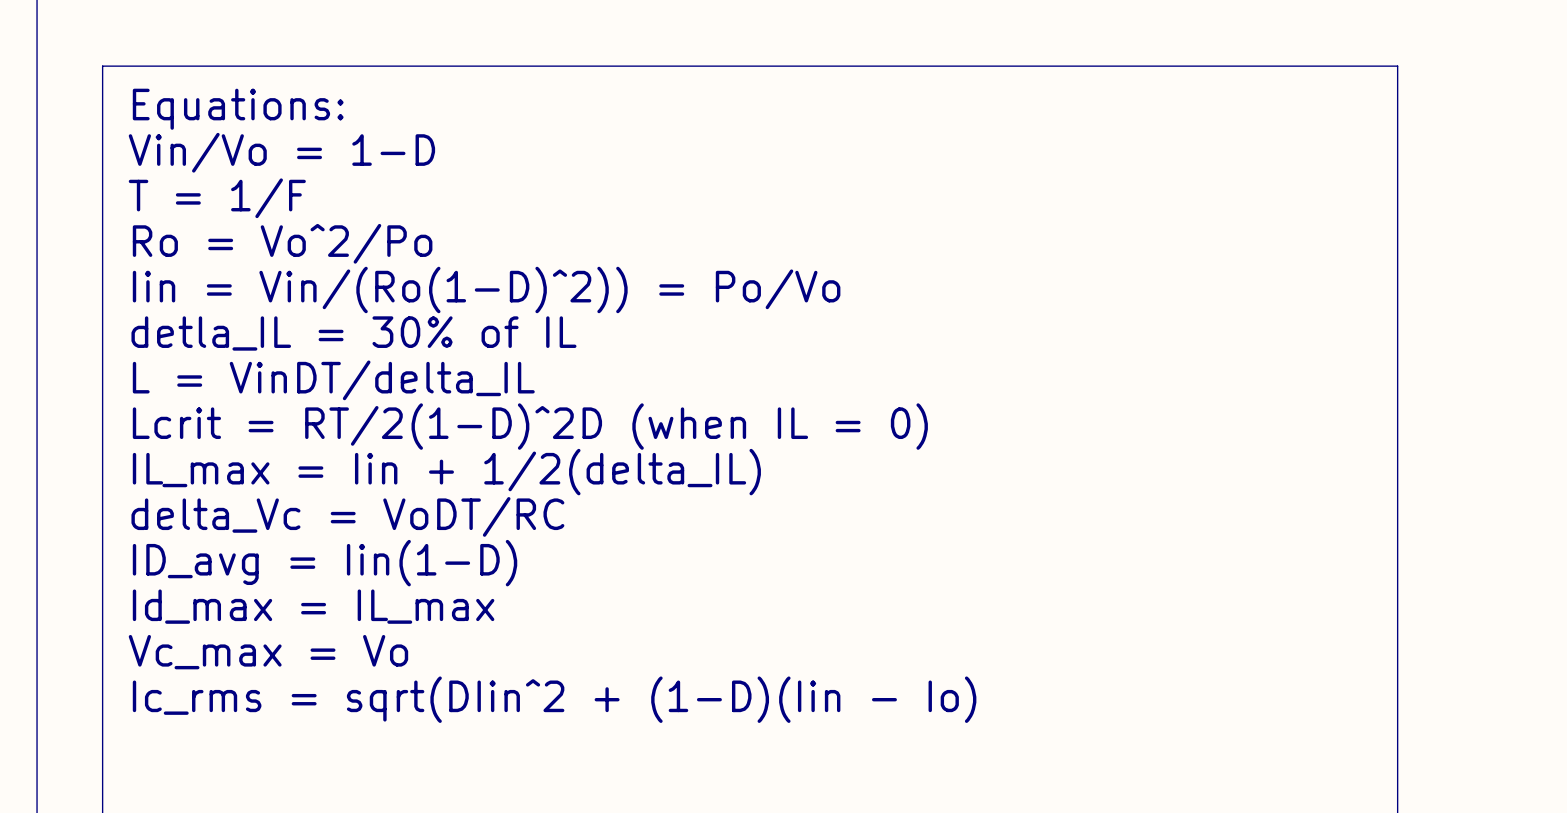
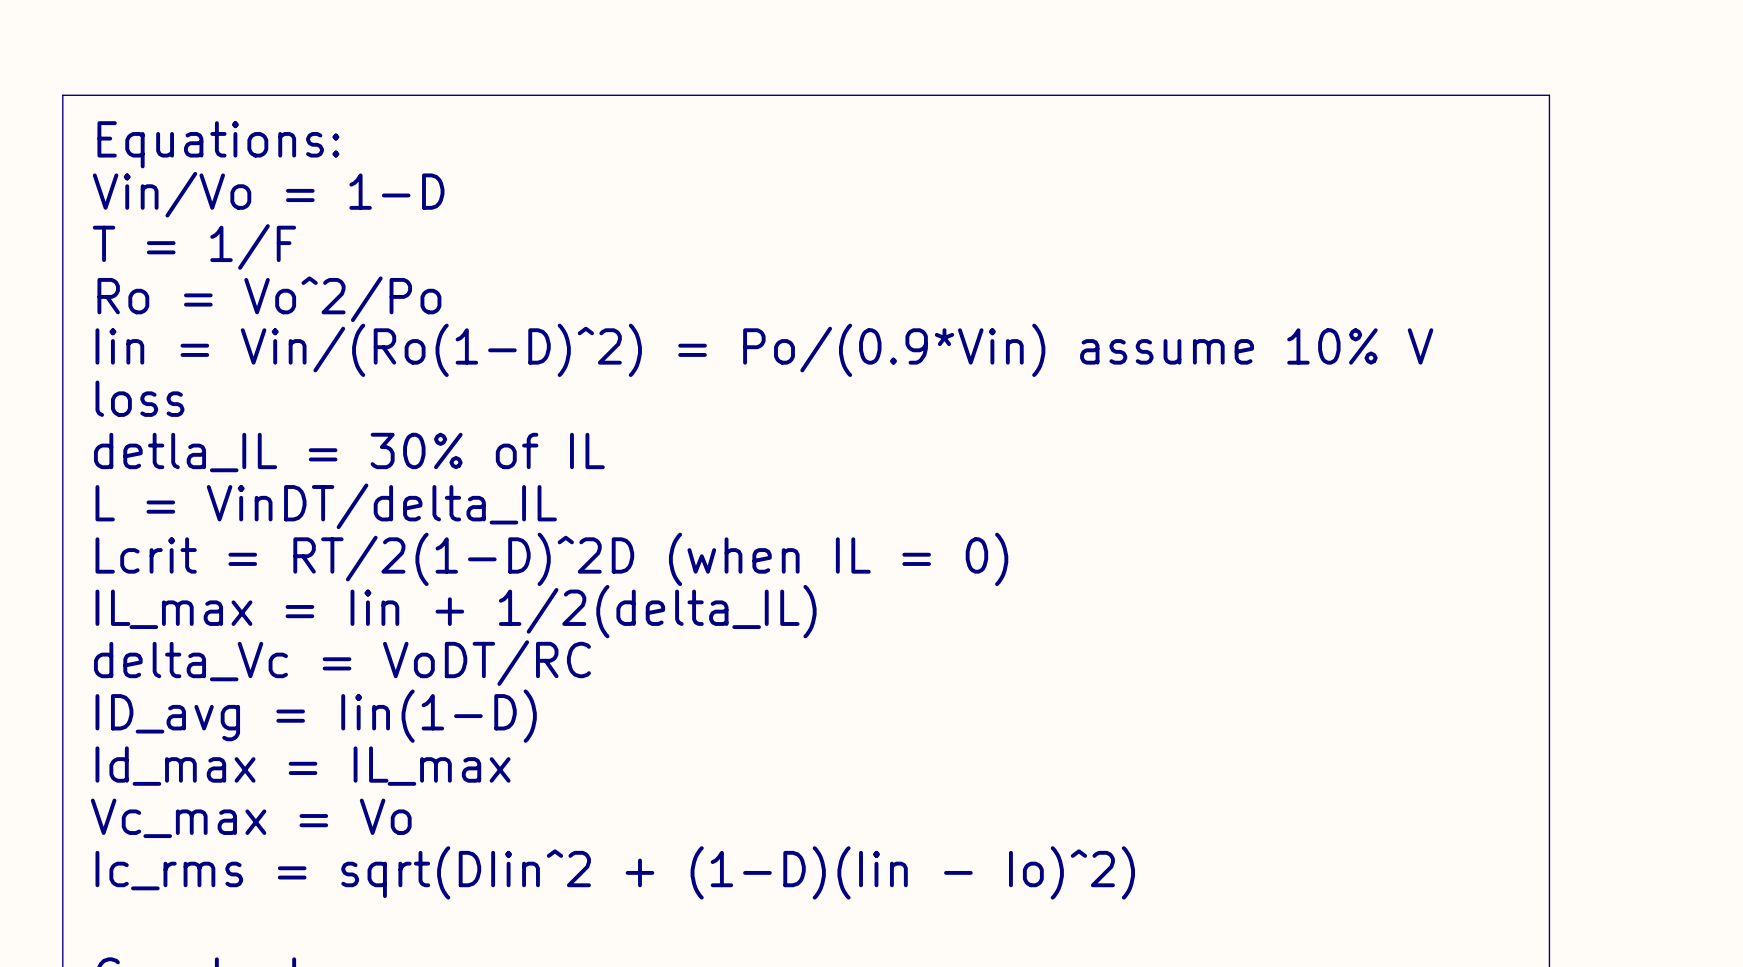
text: Iin = Vin/(Ro(1-D)^2)) = Po/Vo (486, 289) -> Iin = Vin/(Ro(1-D)^2) = Po/(0.9*Vin) assume 10% V (764, 350)
text: none -> loss (139, 398)
text position: detla_IL = 30% of IL (353, 333) -> detla_IL = 30% of IL (349, 452)
text position: L = VinDT/delta_IL (333, 380) -> L = VinDT/delta_IL (326, 506)
text position: Lcrit = RT/2(1-D)^2D (when IL = 0) (530, 426) -> Lcrit = RT/2(1-D)^2D (when IL = 0) (551, 559)
text position: IL_max = Iin + 1/2(delta_IL) (446, 472) -> IL_max = Iin + 1/2(delta_IL) (456, 611)
text position: delta_Vc = VoDT/RC (347, 516) -> delta_Vc = VoDT/RC (342, 663)
text position: ID_avg = Iin(1-D) (325, 563) -> ID_avg = Iin(1-D) (316, 716)
text position: Id_max = IL_max (313, 606) -> Id_max = IL_max (303, 766)
text position: Vc_max = Vo (268, 652) -> Vc_max = Vo (251, 818)
text: Ic_rms = sqrt(DIin^2 + (1-D)(Iin - Io) (554, 699) -> Ic_rms = sqrt(DIin^2 + (1-D)(Iin - Io)^2) (615, 872)

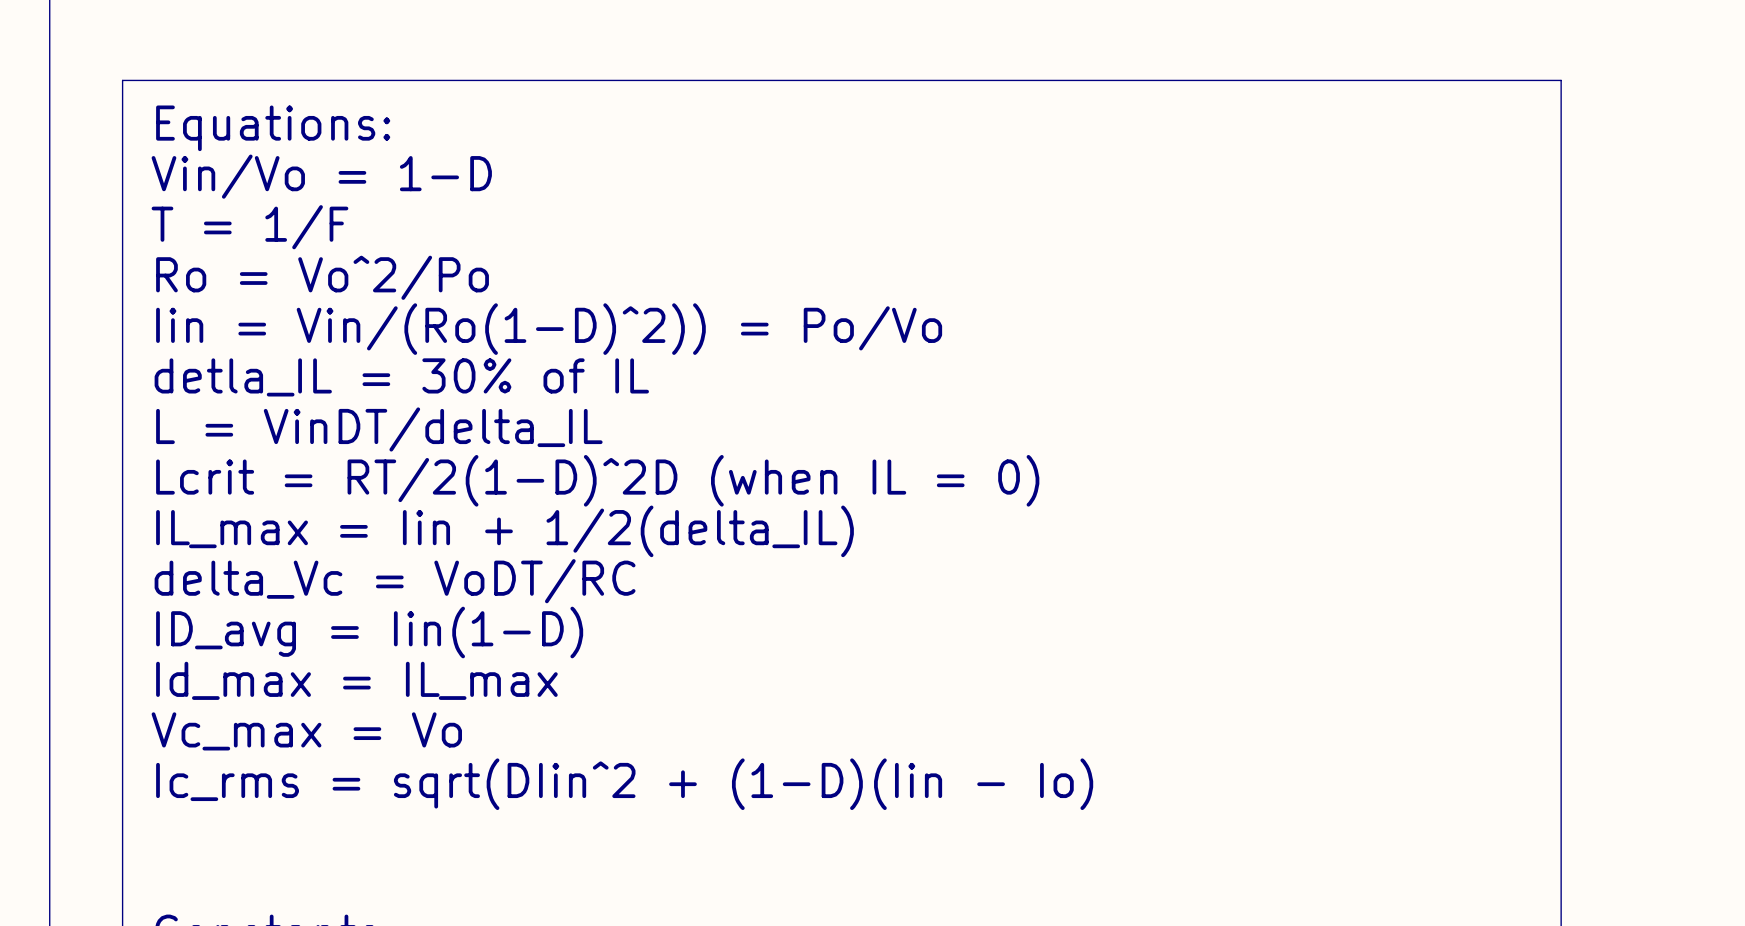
text: Iin = Vin/(Ro(1-D)^2) = Po/(0.9*Vin) assume 10% V (764, 350) -> Iin = Vin/(Ro(1-D)^2)) = Po/Vo (549, 329)
text: loss (139, 398) -> none
text position: detla_IL = 30% of IL (349, 452) -> detla_IL = 30% of IL (401, 377)
text position: L = VinDT/delta_IL (326, 506) -> L = VinDT/delta_IL (379, 429)
text position: Lcrit = RT/2(1-D)^2D (when IL = 0) (551, 559) -> Lcrit = RT/2(1-D)^2D (when IL = 0) (597, 480)
text position: IL_max = Iin + 1/2(delta_IL) (456, 611) -> IL_max = Iin + 1/2(delta_IL) (504, 531)
text position: delta_Vc = VoDT/RC (342, 663) -> delta_Vc = VoDT/RC (395, 581)
text position: ID_avg = Iin(1-D) (316, 716) -> ID_avg = Iin(1-D) (369, 632)
text position: Id_max = IL_max (303, 766) -> Id_max = IL_max (356, 680)
text position: Vc_max = Vo (251, 818) -> Vc_max = Vo (306, 731)
text: Ic_rms = sqrt(DIin^2 + (1-D)(Iin - Io)^2) (615, 872) -> Ic_rms = sqrt(DIin^2 + (1-D)(Iin - Io) (624, 784)

